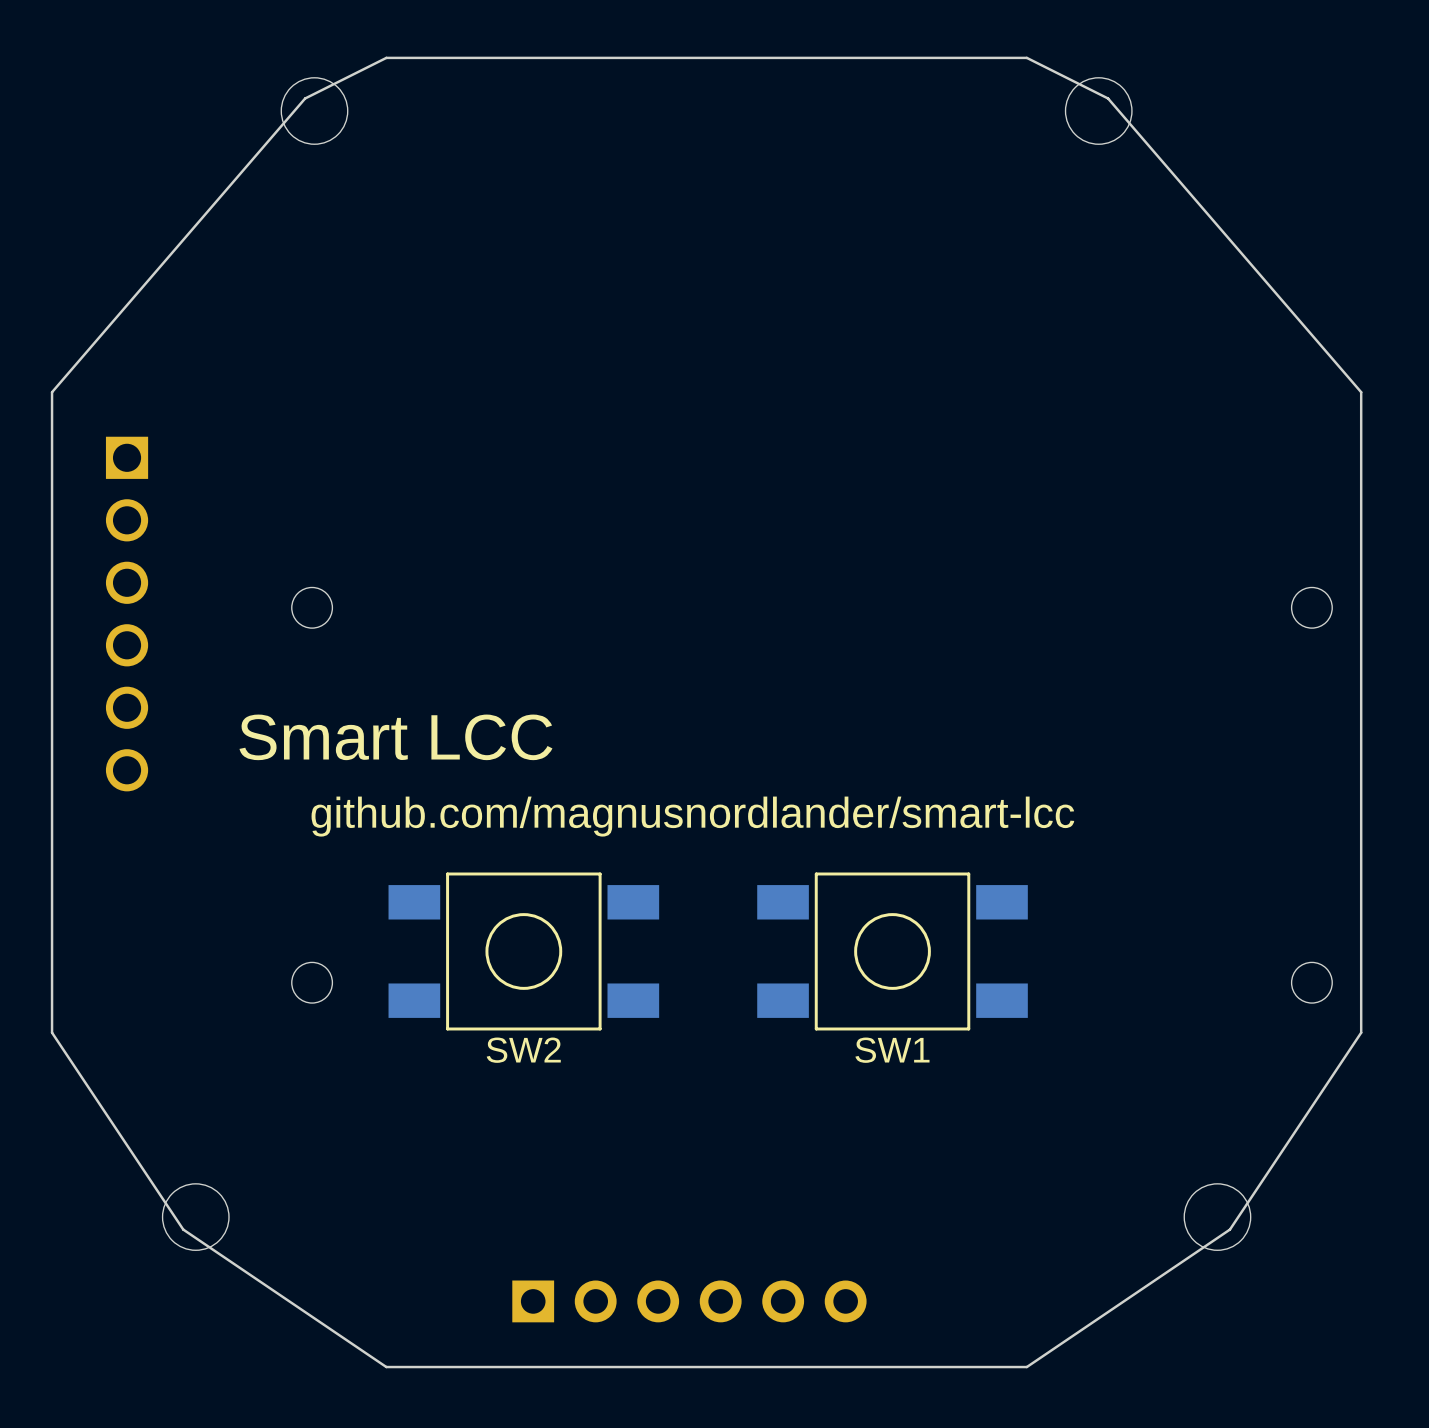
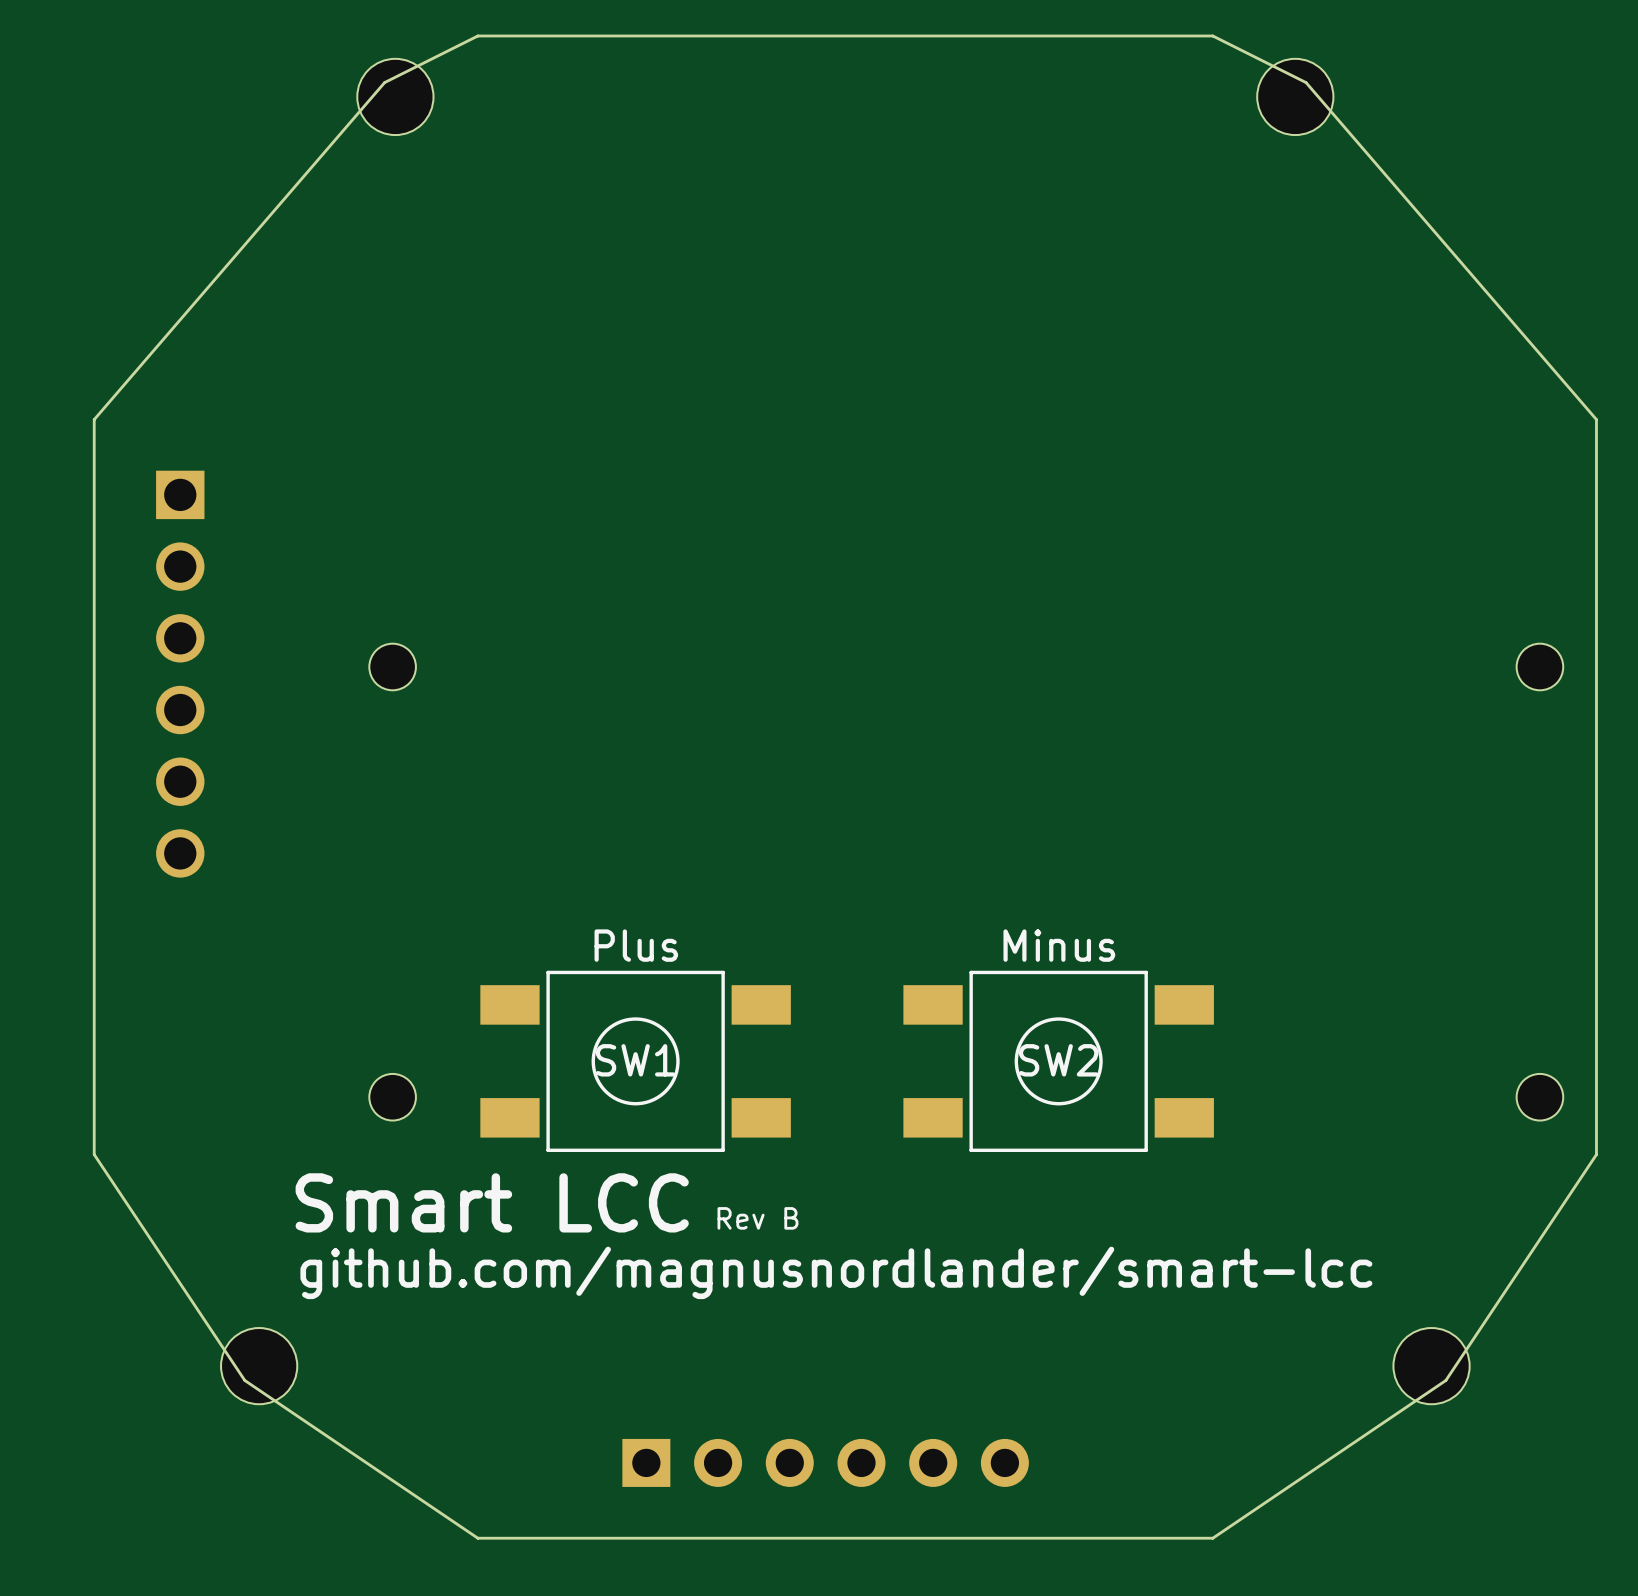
text position: Smart LCC (395, 737) -> Smart LCC (492, 1202)
text position: github.com/magnusnordlander/smart-lcc (692, 816) -> github.com/magnusnordlander/smart-lcc (836, 1272)
text: none -> Plus (636, 945)
text: none -> Minus (1059, 945)
SW2 name: SW2 (523, 1050) -> SW1 (635, 1060)
SW1 name: SW1 (892, 1050) -> SW2 (1058, 1060)
text: none -> Rev B (757, 1218)

